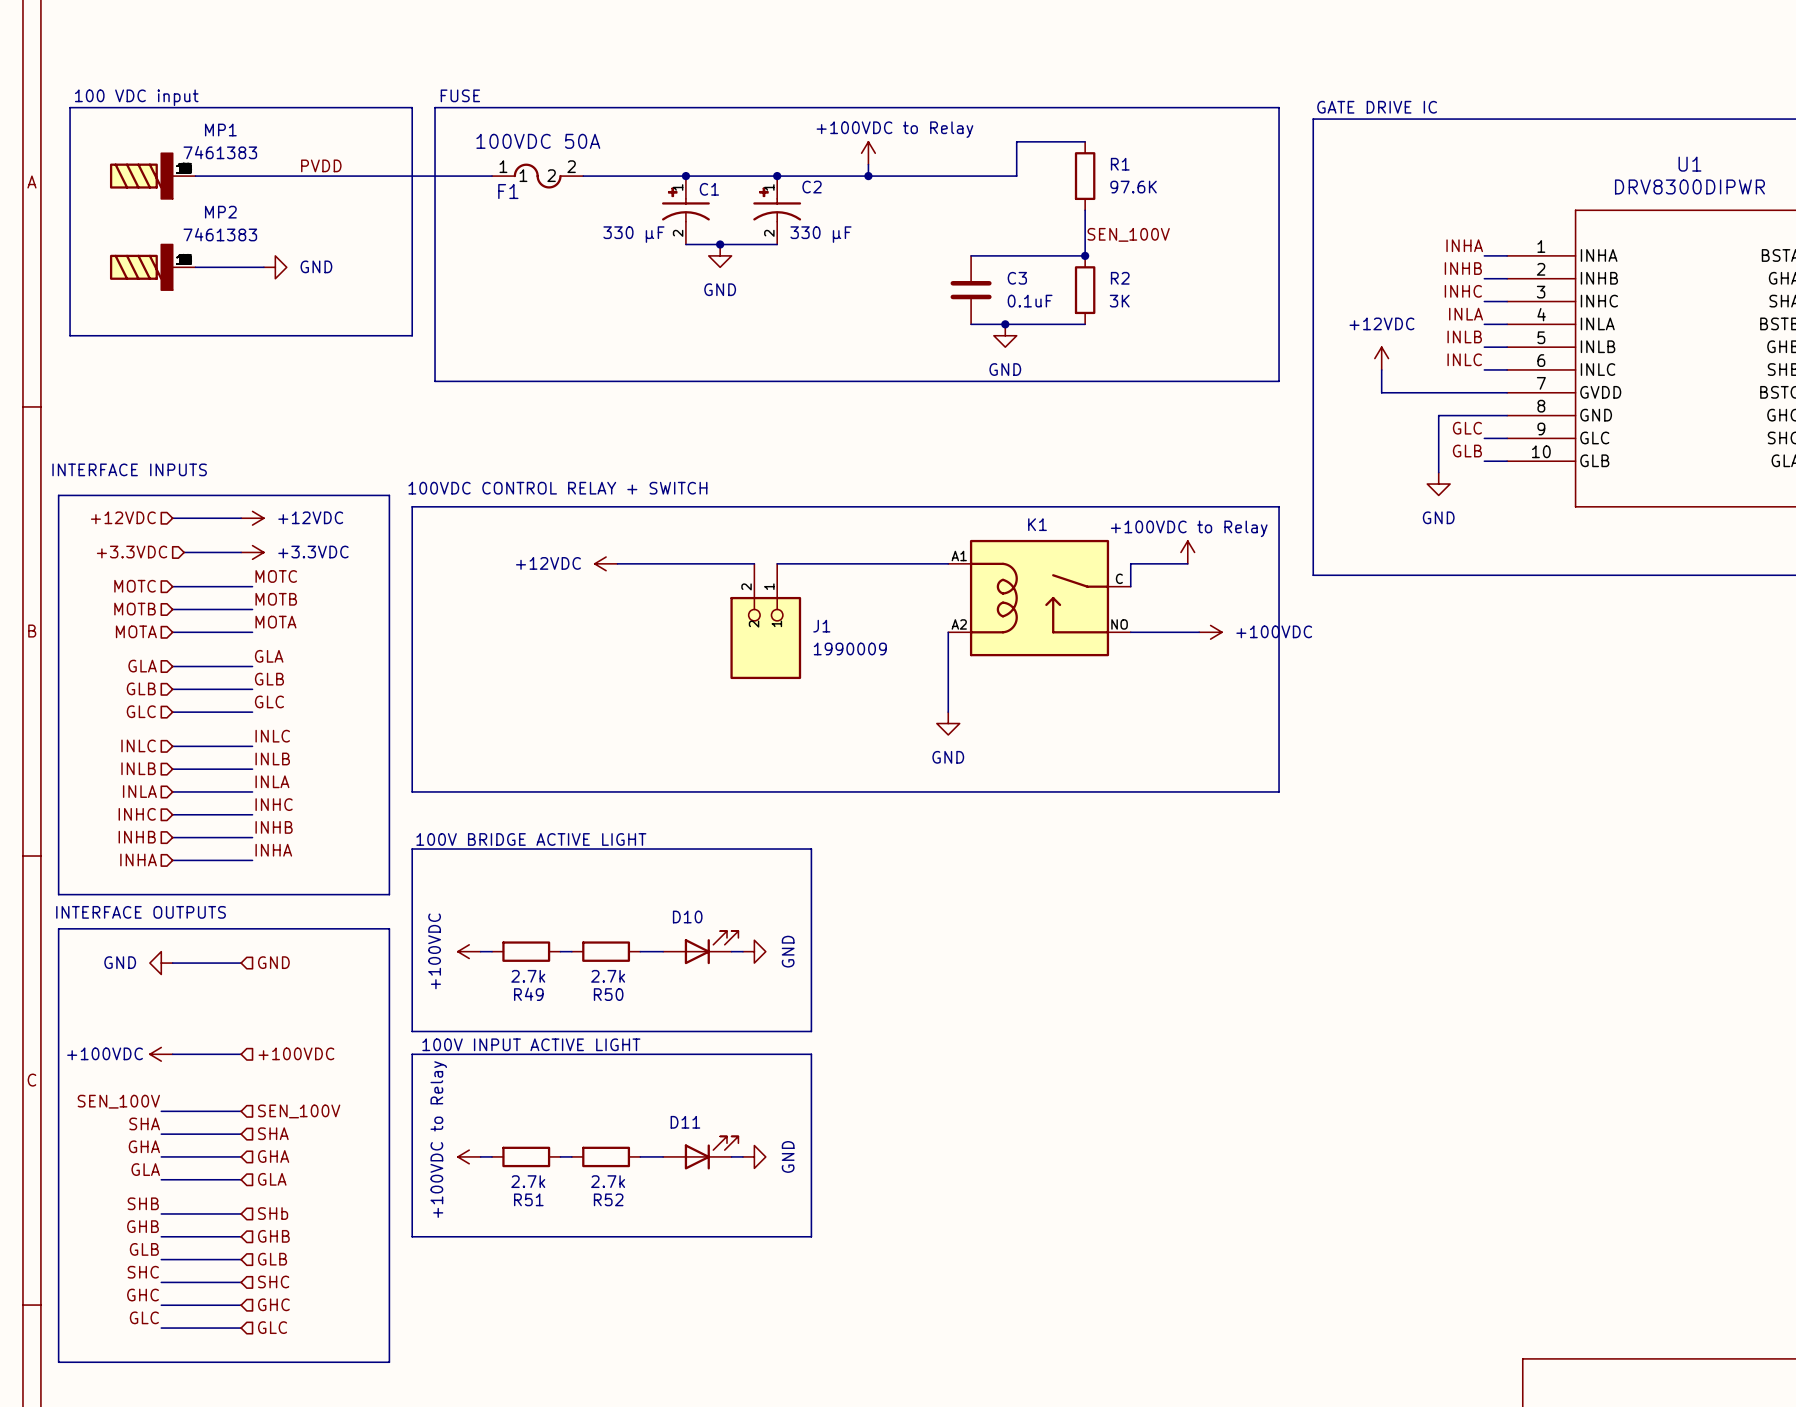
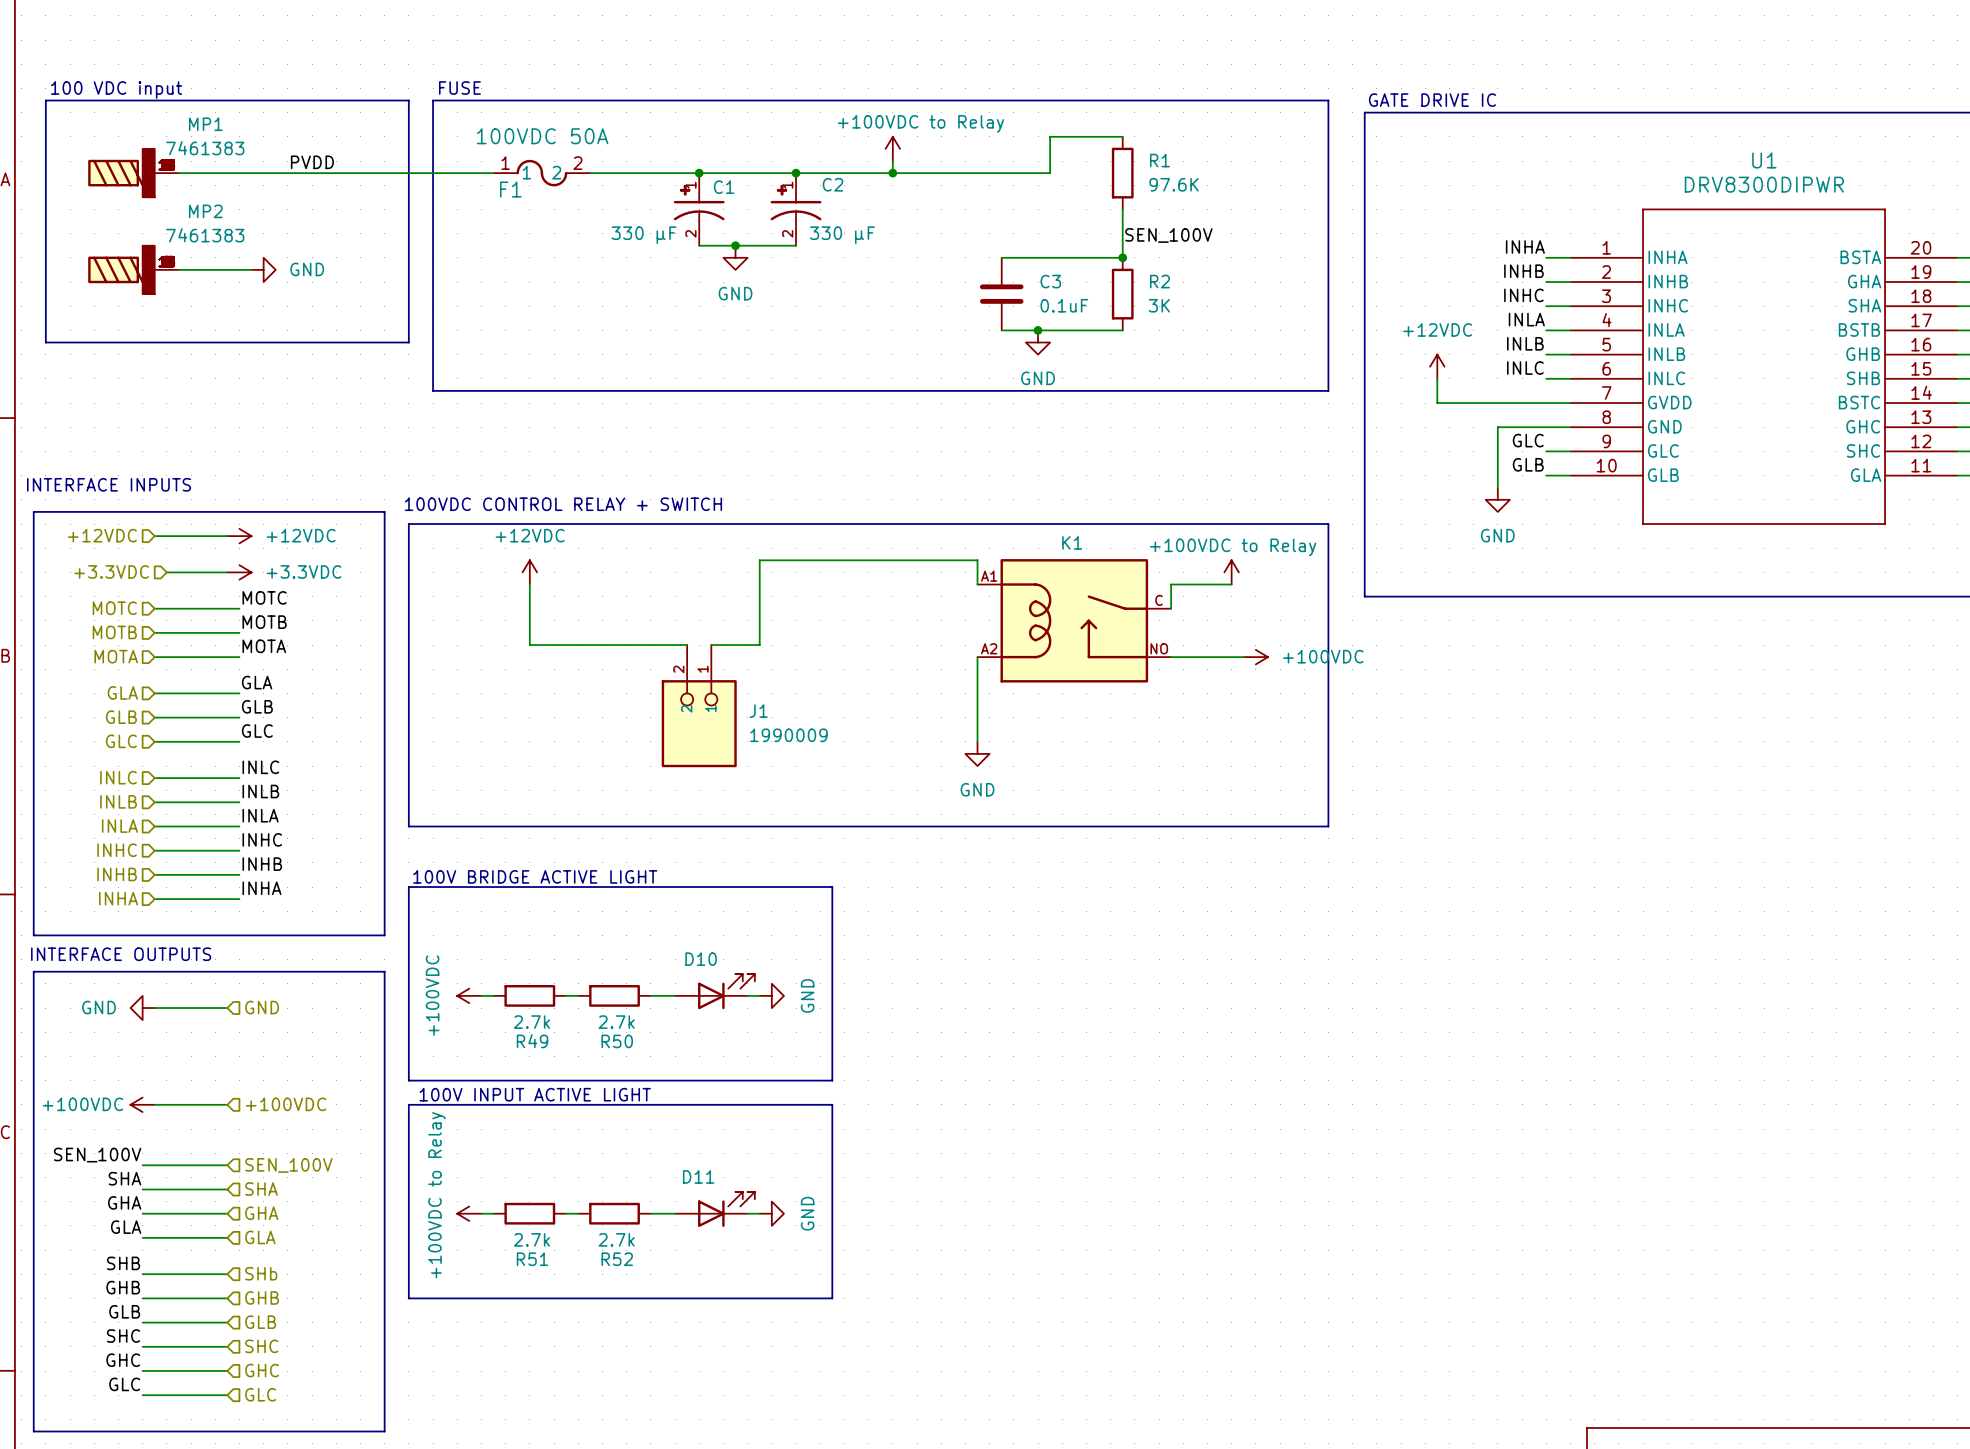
wire: none -> (529, 584) (529, 645) (687, 645)
power symbol text position: +12VDC (548, 563) -> +12VDC (530, 535)
power symbol rotation: 0° (606, 563) -> 90° clockwise (529, 572)
power symbol position: +12VDC (606, 563) -> +12VDC (529, 572)
wire: (617, 563) (754, 563) -> none
wire: (777, 563) (948, 563) -> (711, 645) (759, 645) (759, 560) (977, 560) (977, 584)
J1 position: (765, 621) -> (699, 706)

